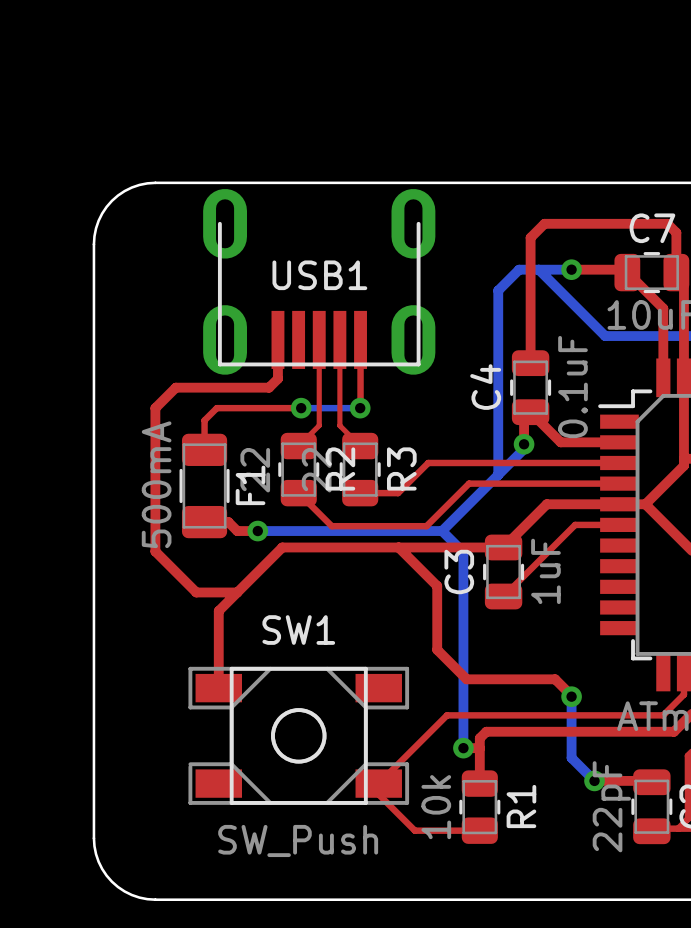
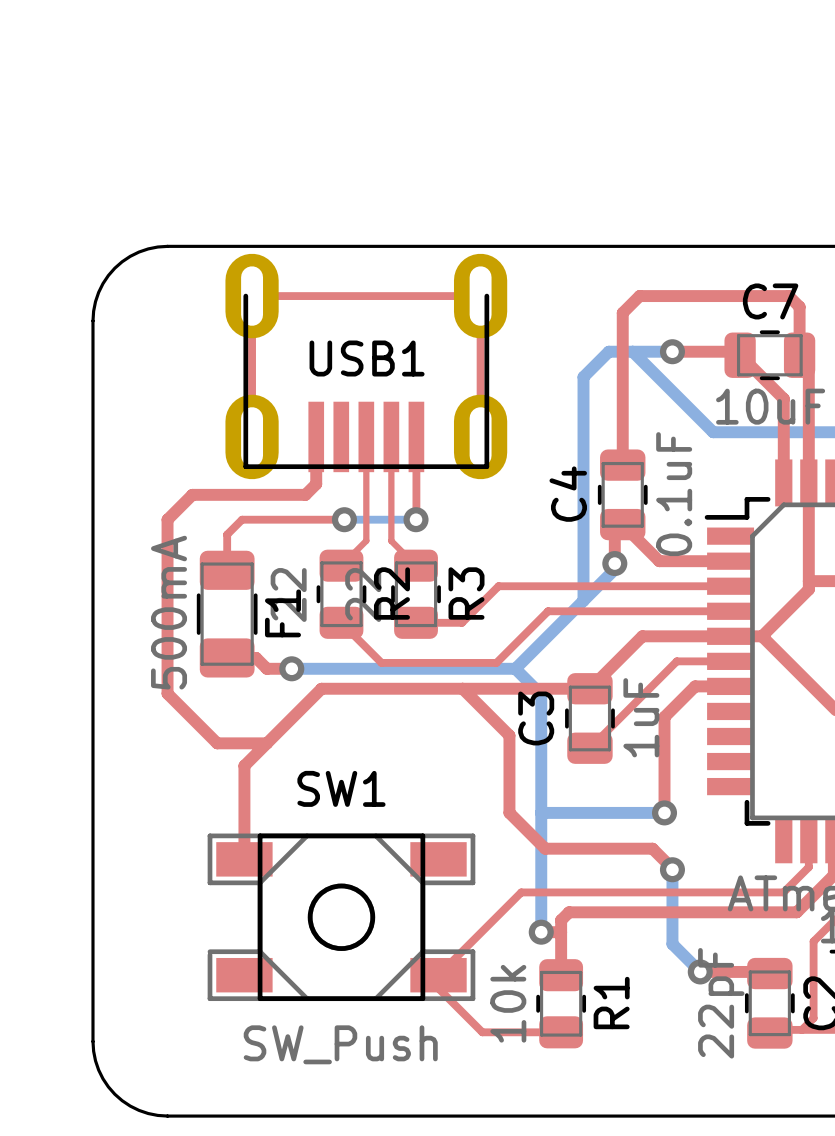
top track: none -> (252, 436) (252, 296) (480, 296) (480, 436)
top track: none -> (730, 686) (695, 686) (664, 717) (664, 812)
bottom track: none -> (541, 812) (664, 812)
via: none -> (664, 812)

